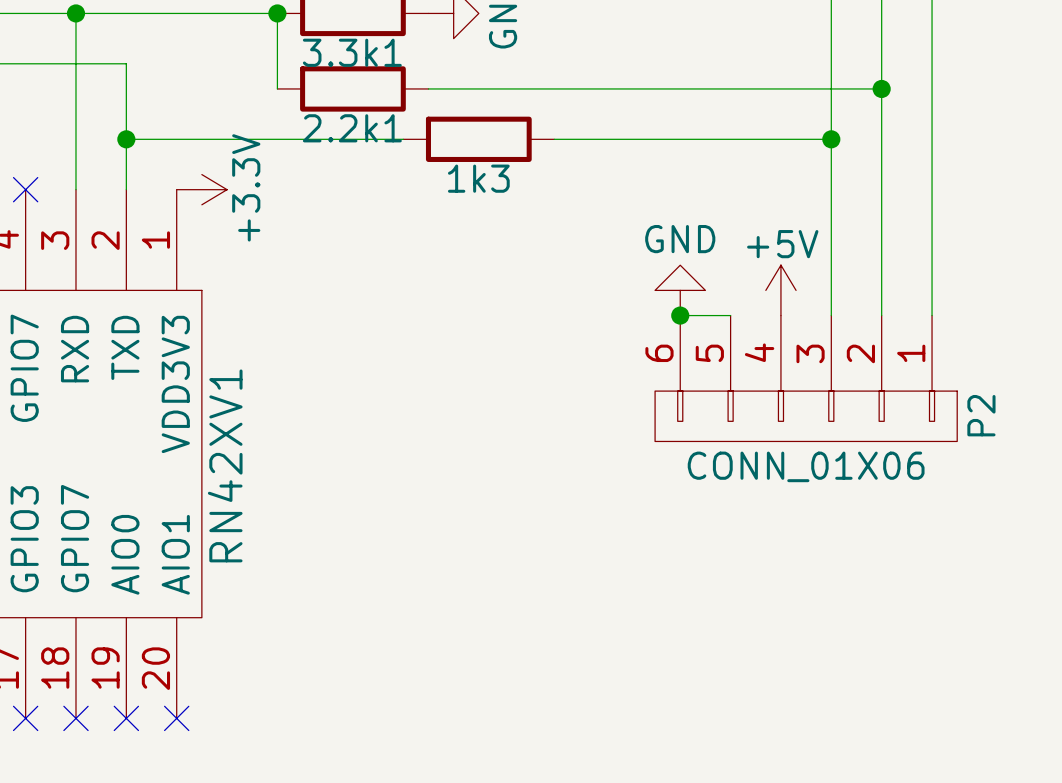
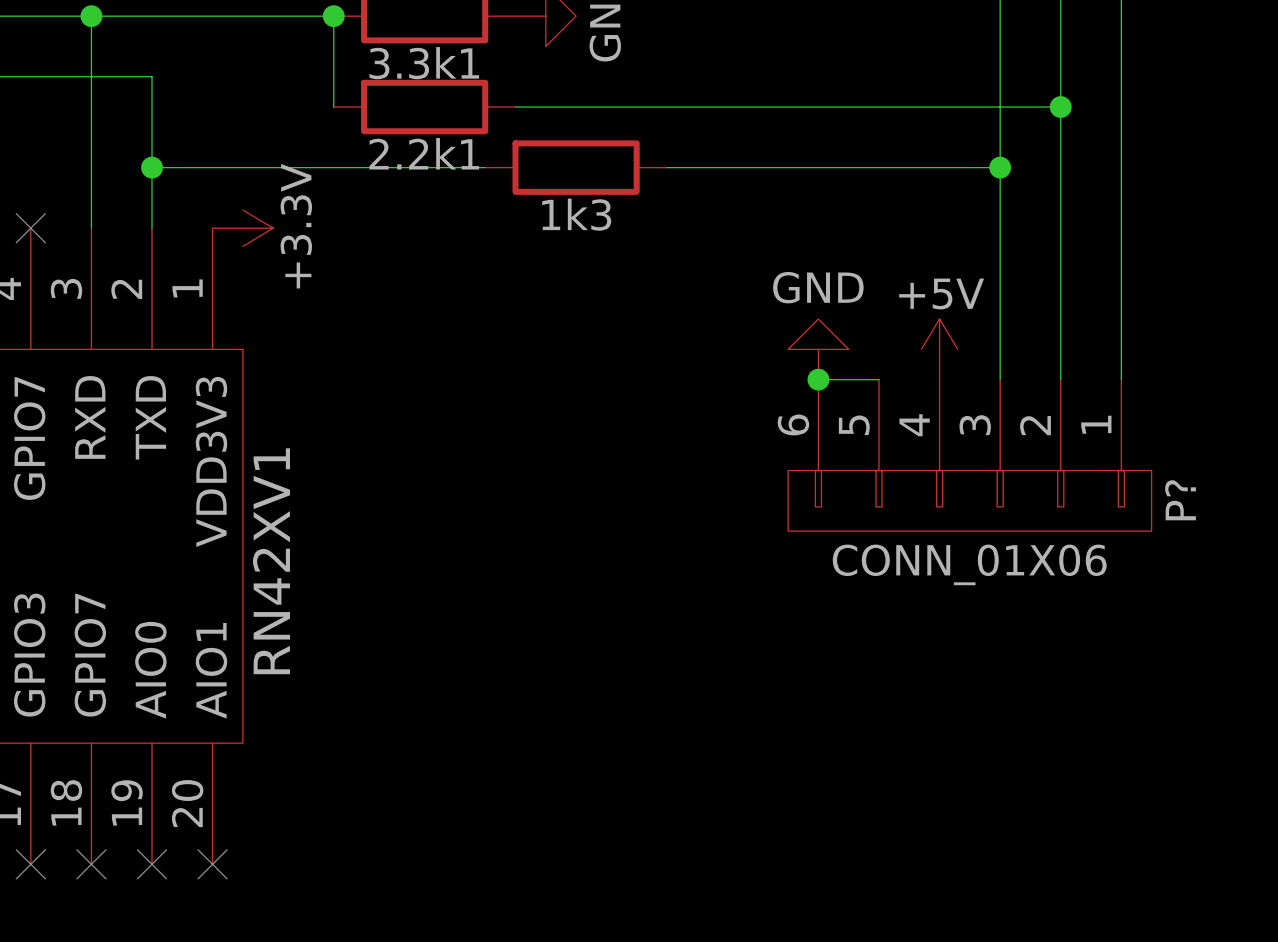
P2 name: P2 (981, 415) -> P? (1180, 500)

